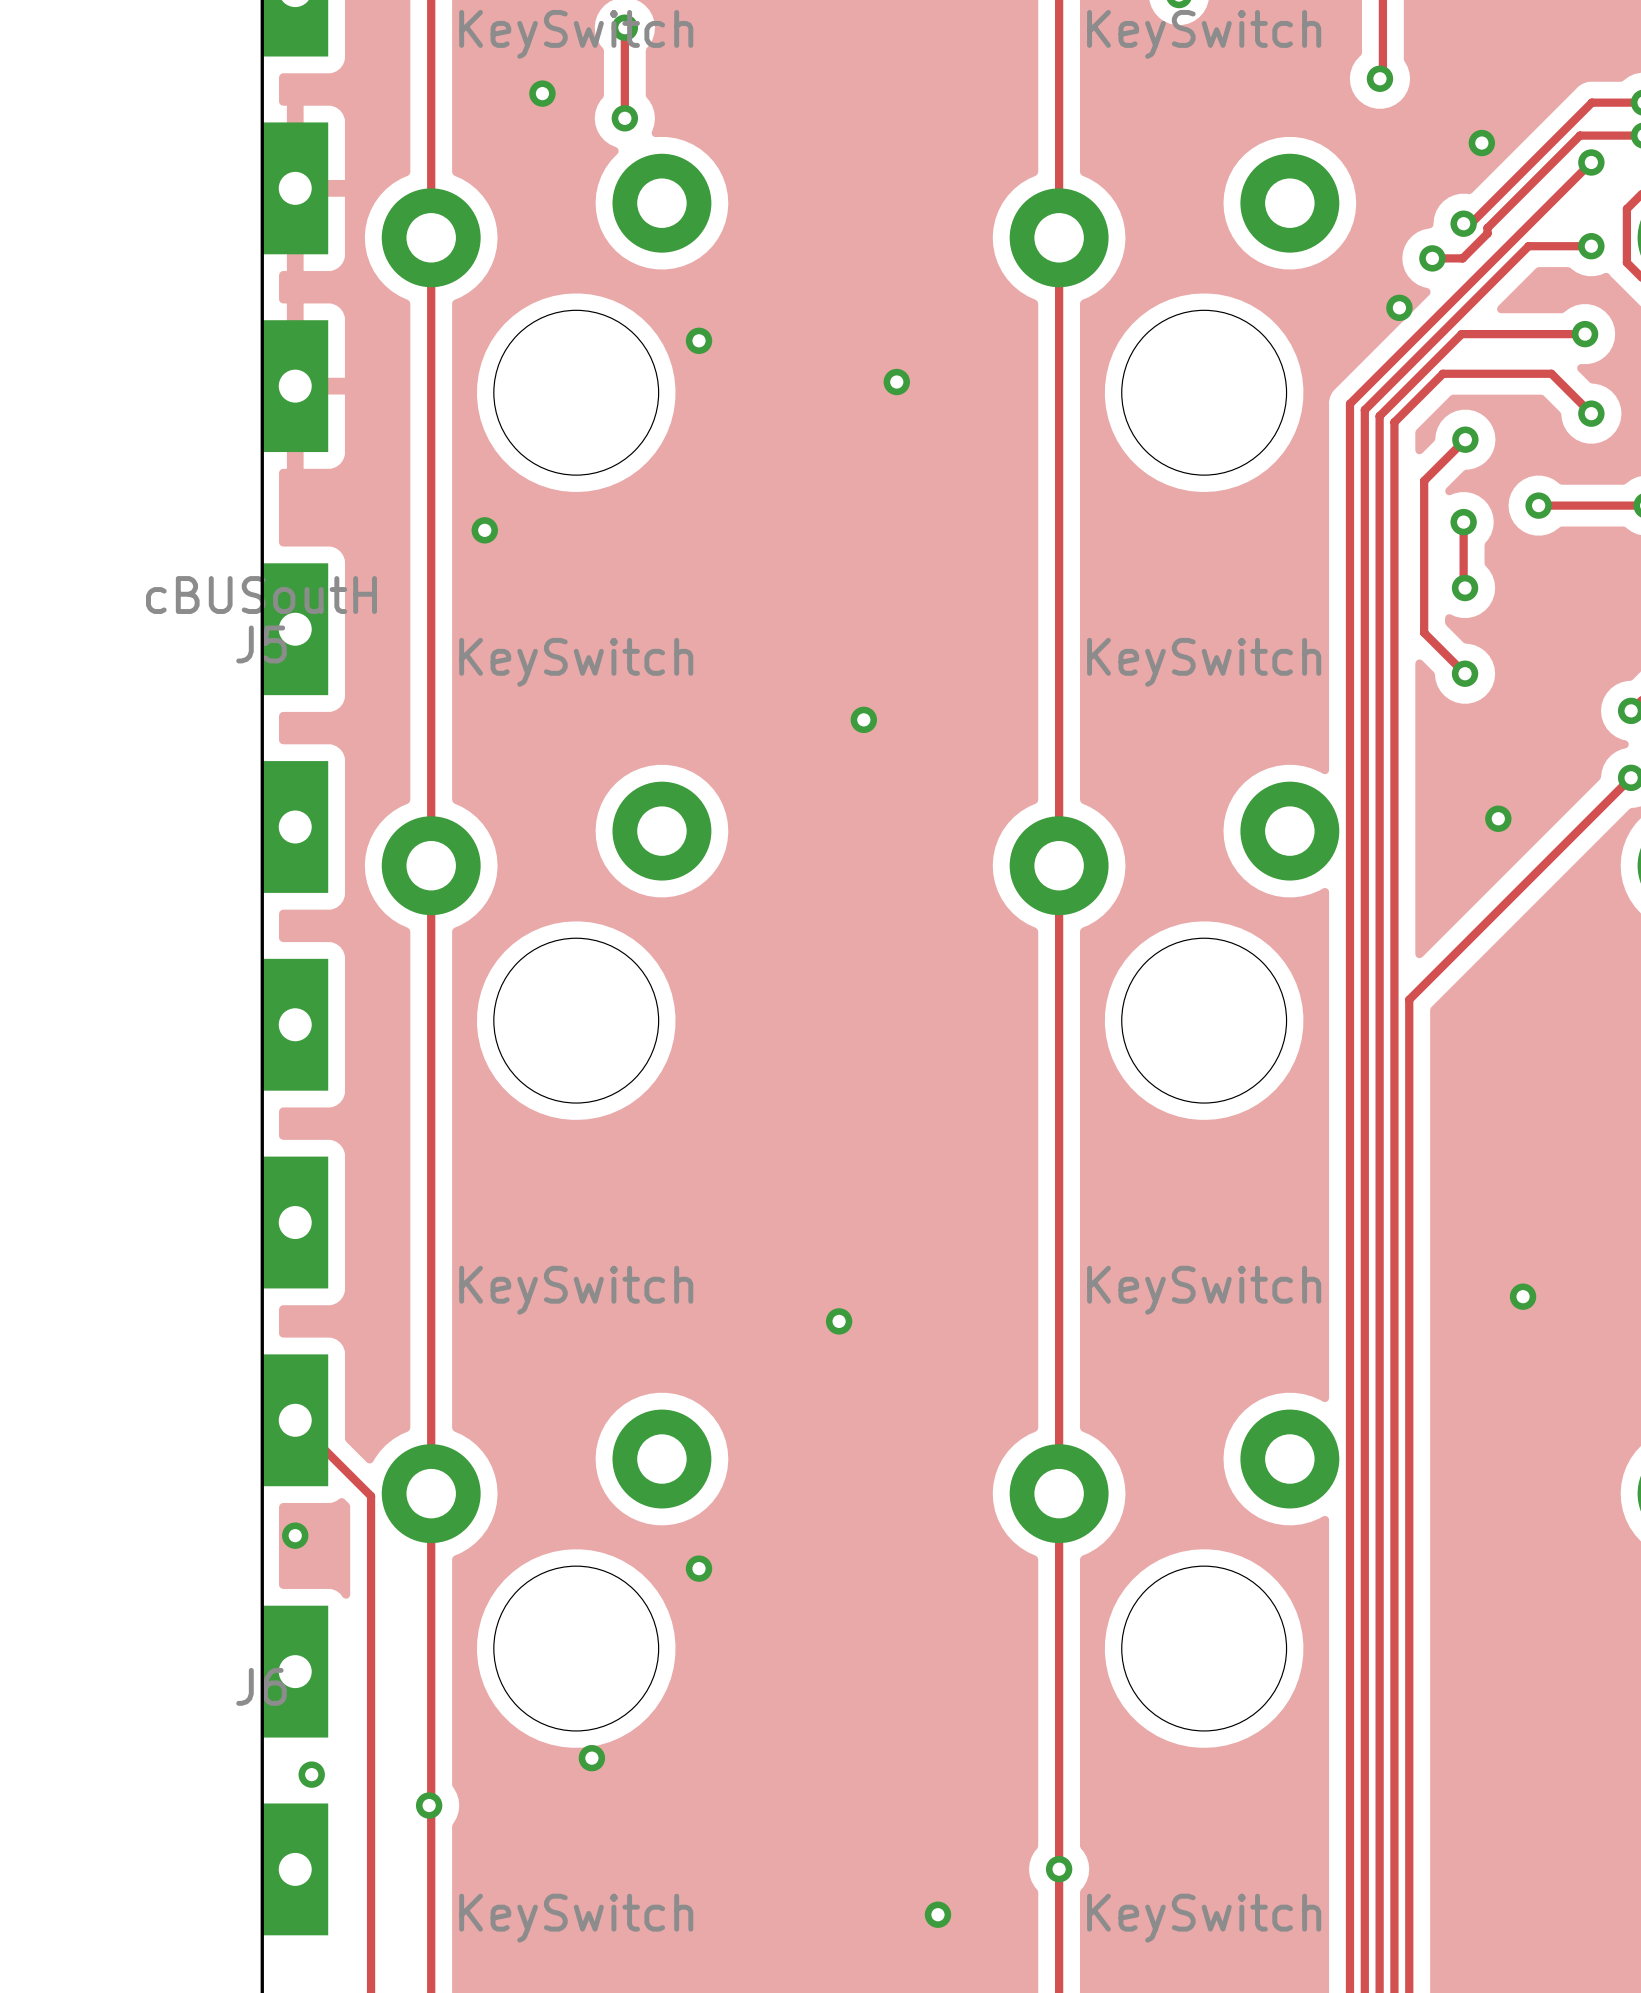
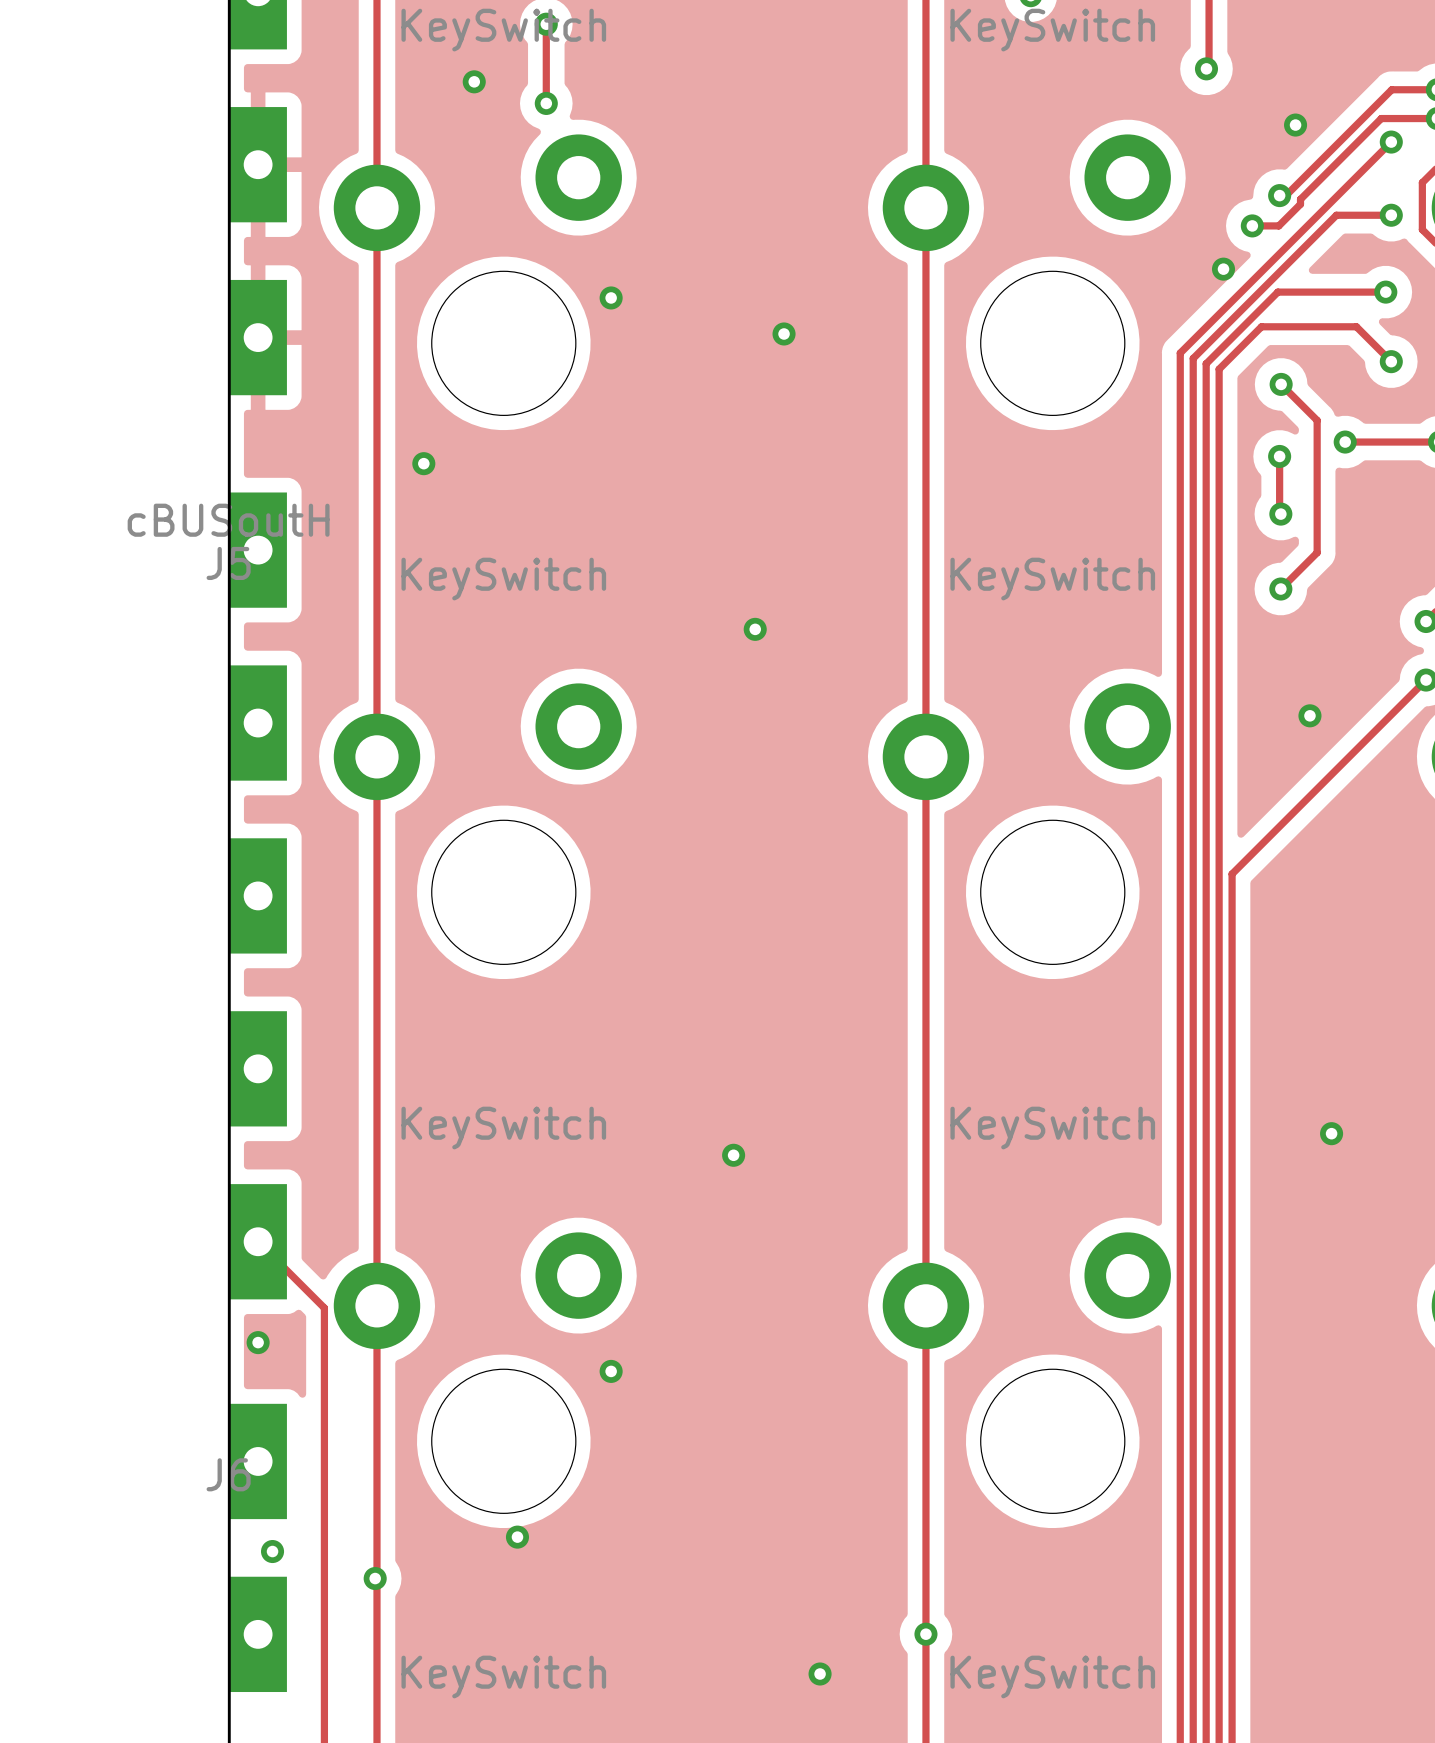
track: (1465, 439) (1424, 480) (1424, 632) (1465, 673) -> (1281, 384) (1317, 420) (1317, 552) (1280, 589)

